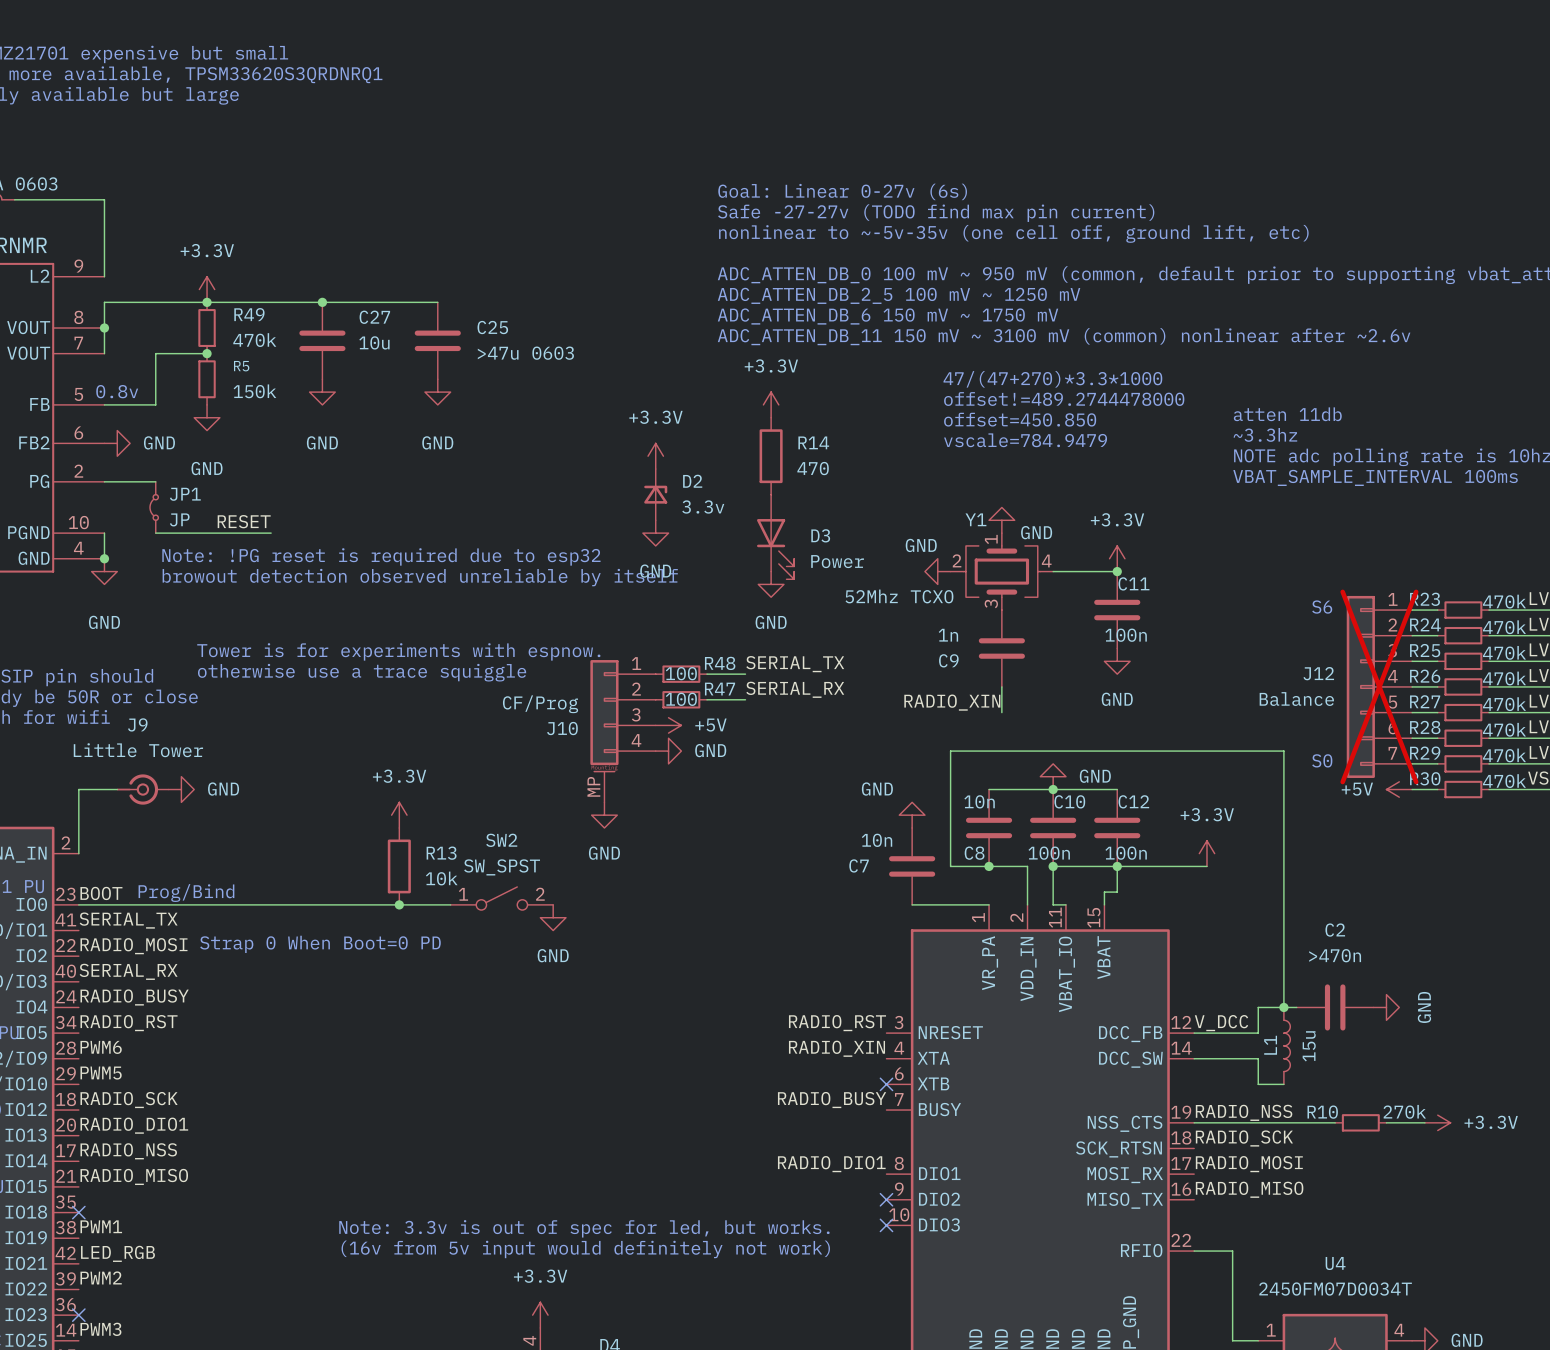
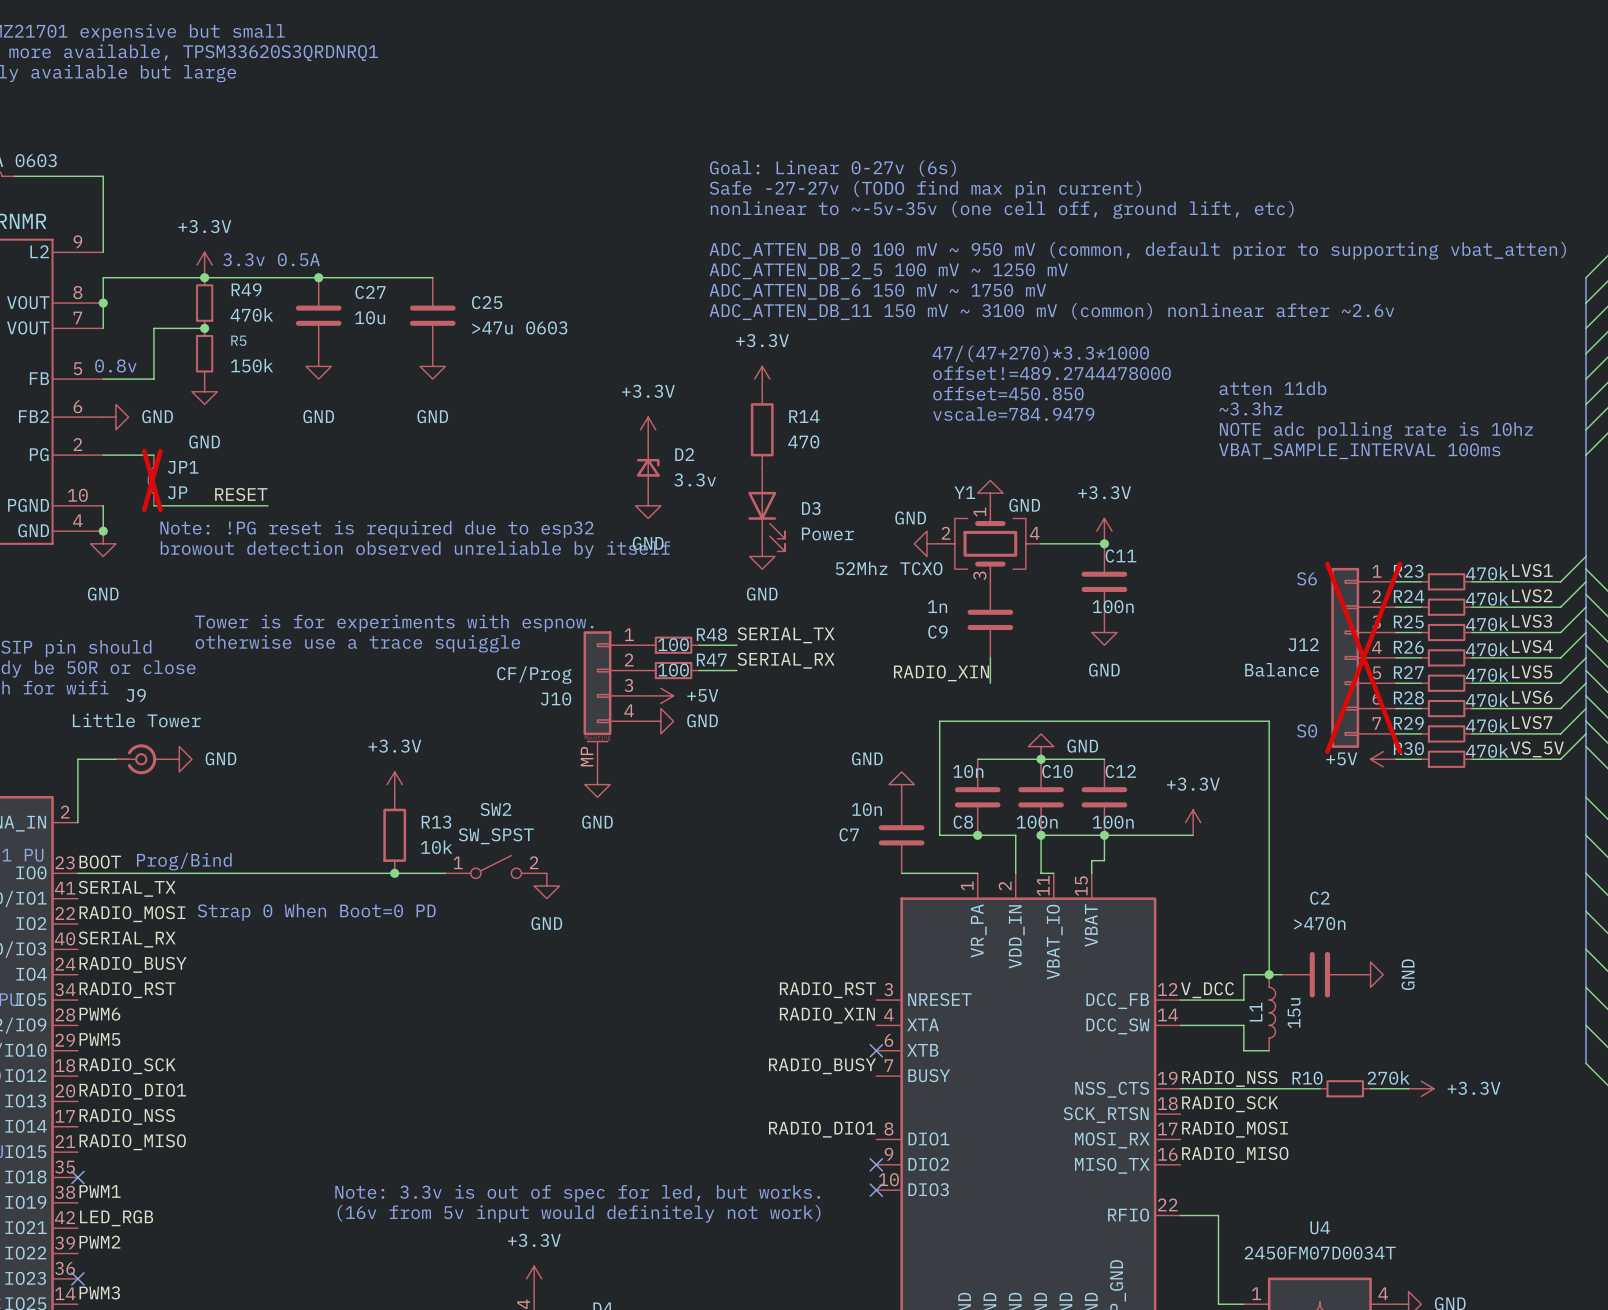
text: none -> 3.3v 0.5A (271, 259)
JP1 do-not-place cross: none -> (152, 480)

